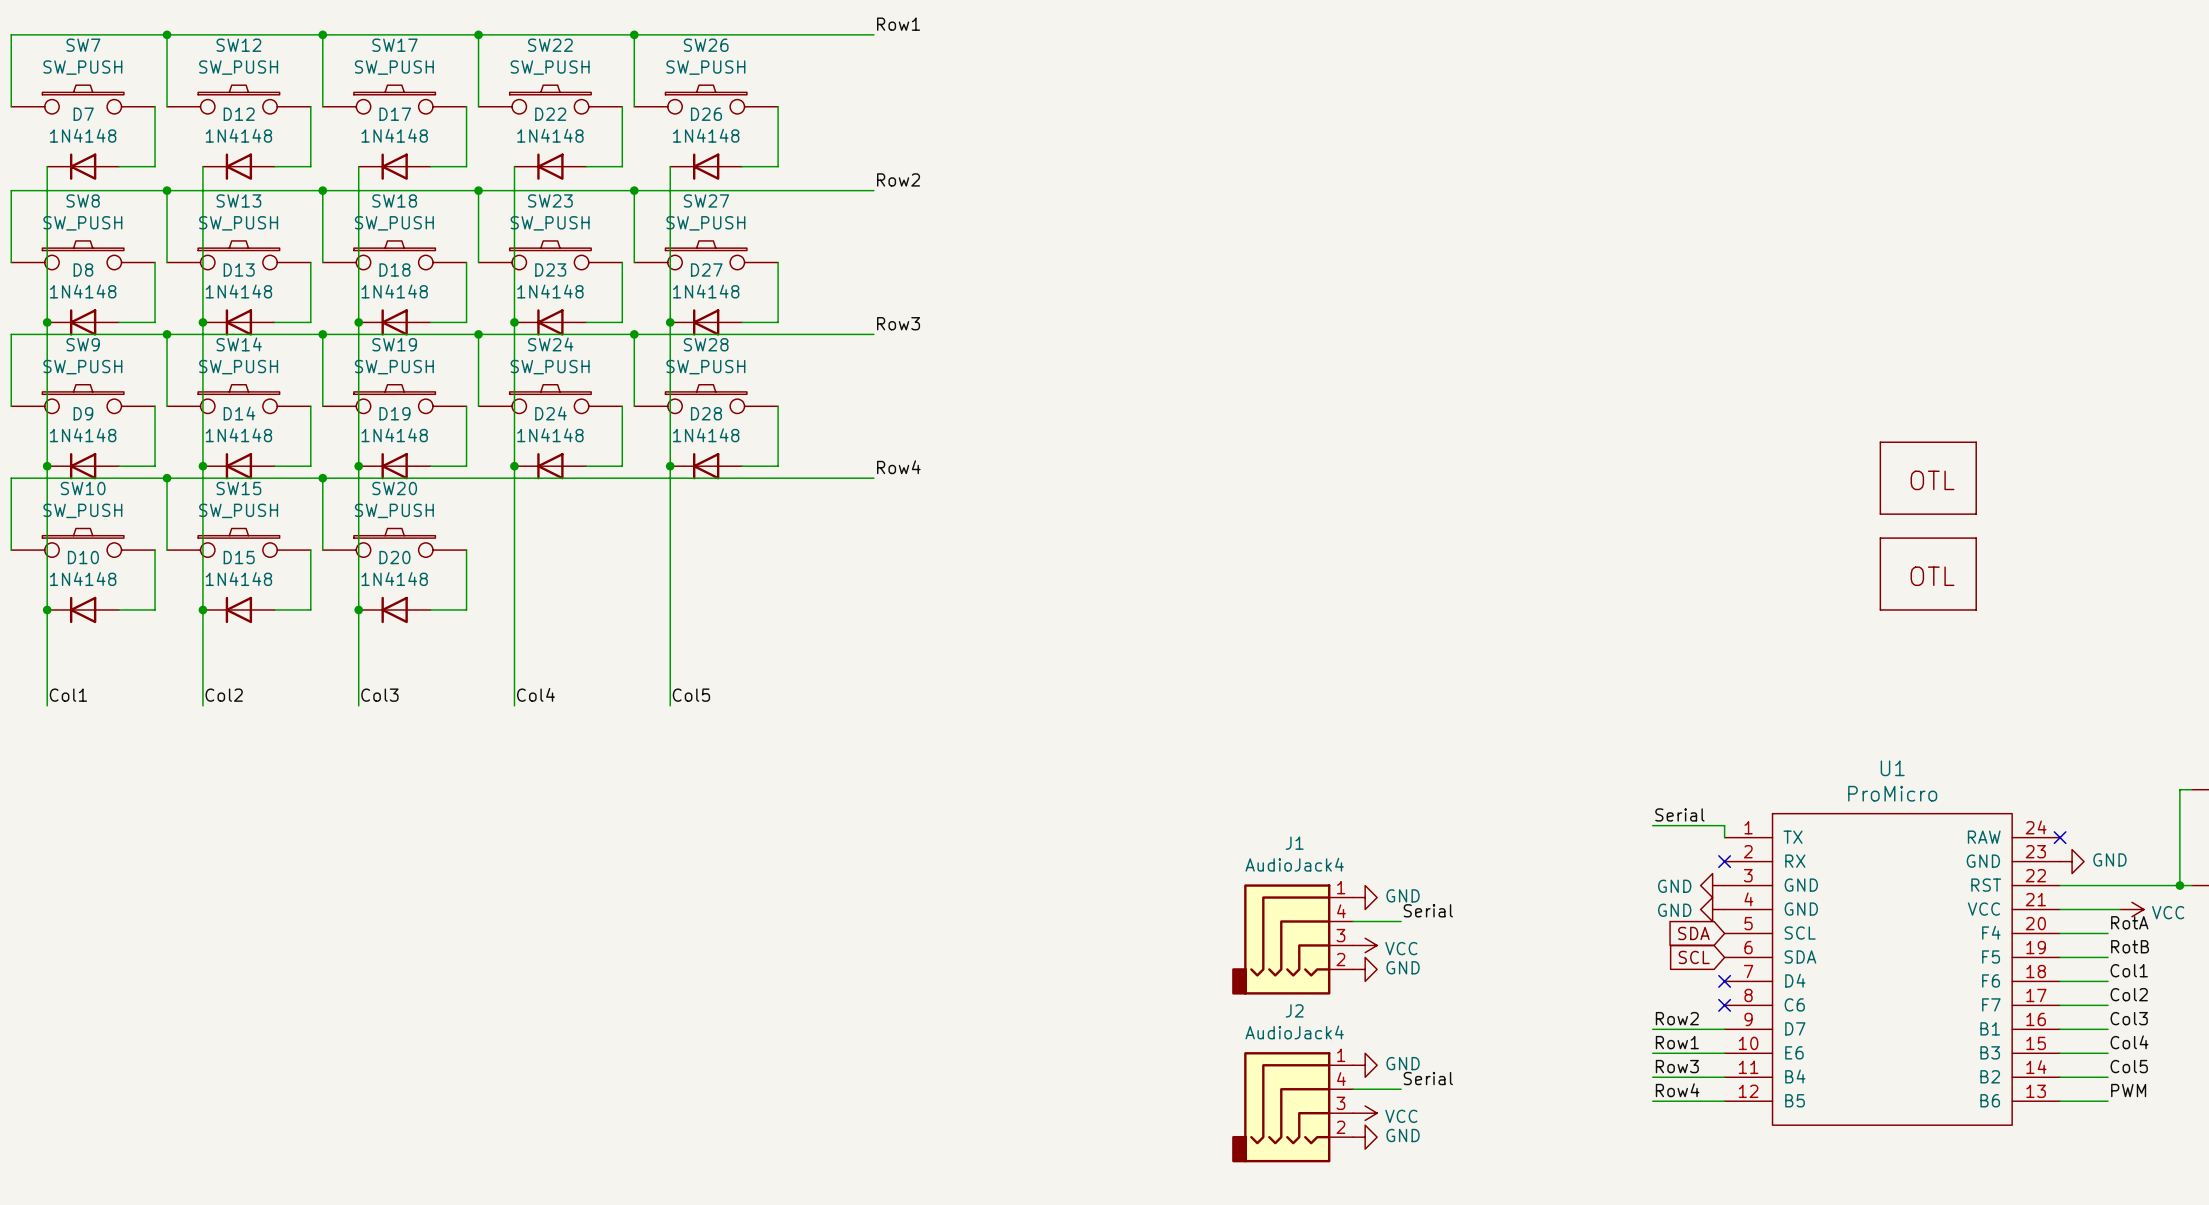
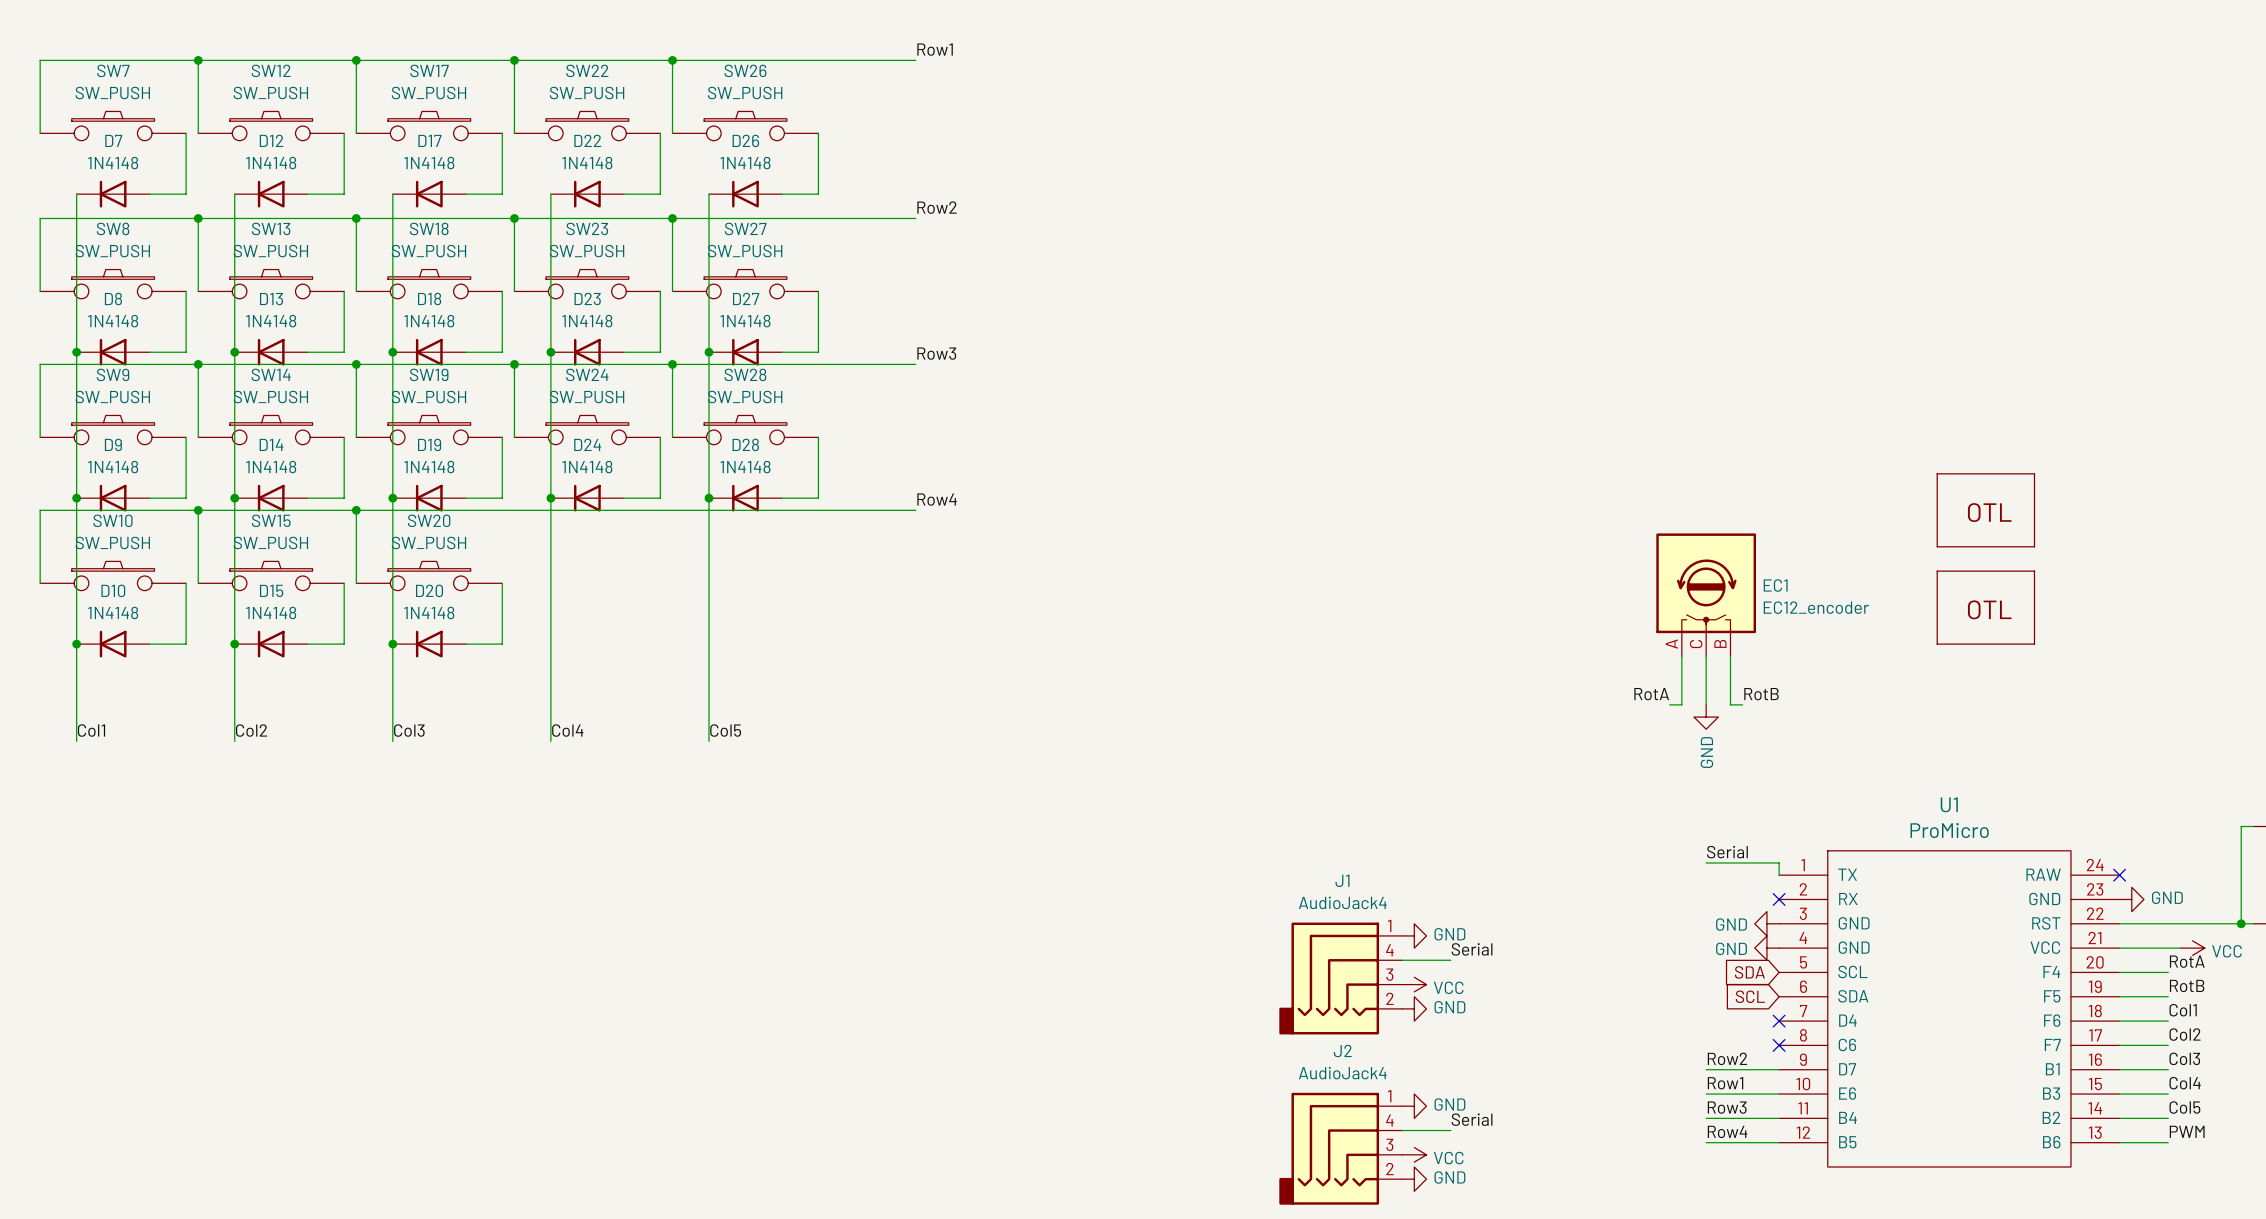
EC1: none -> EC12_encoder (1706, 594)
wire: none -> (1681, 656) (1681, 704) (1669, 704)
wire: none -> (1706, 656) (1706, 704)
wire: none -> (1730, 656) (1730, 704) (1742, 704)
label: none -> RotA (1651, 694)
label: none -> RotB (1761, 694)
power symbol: none -> GND (1706, 717)

